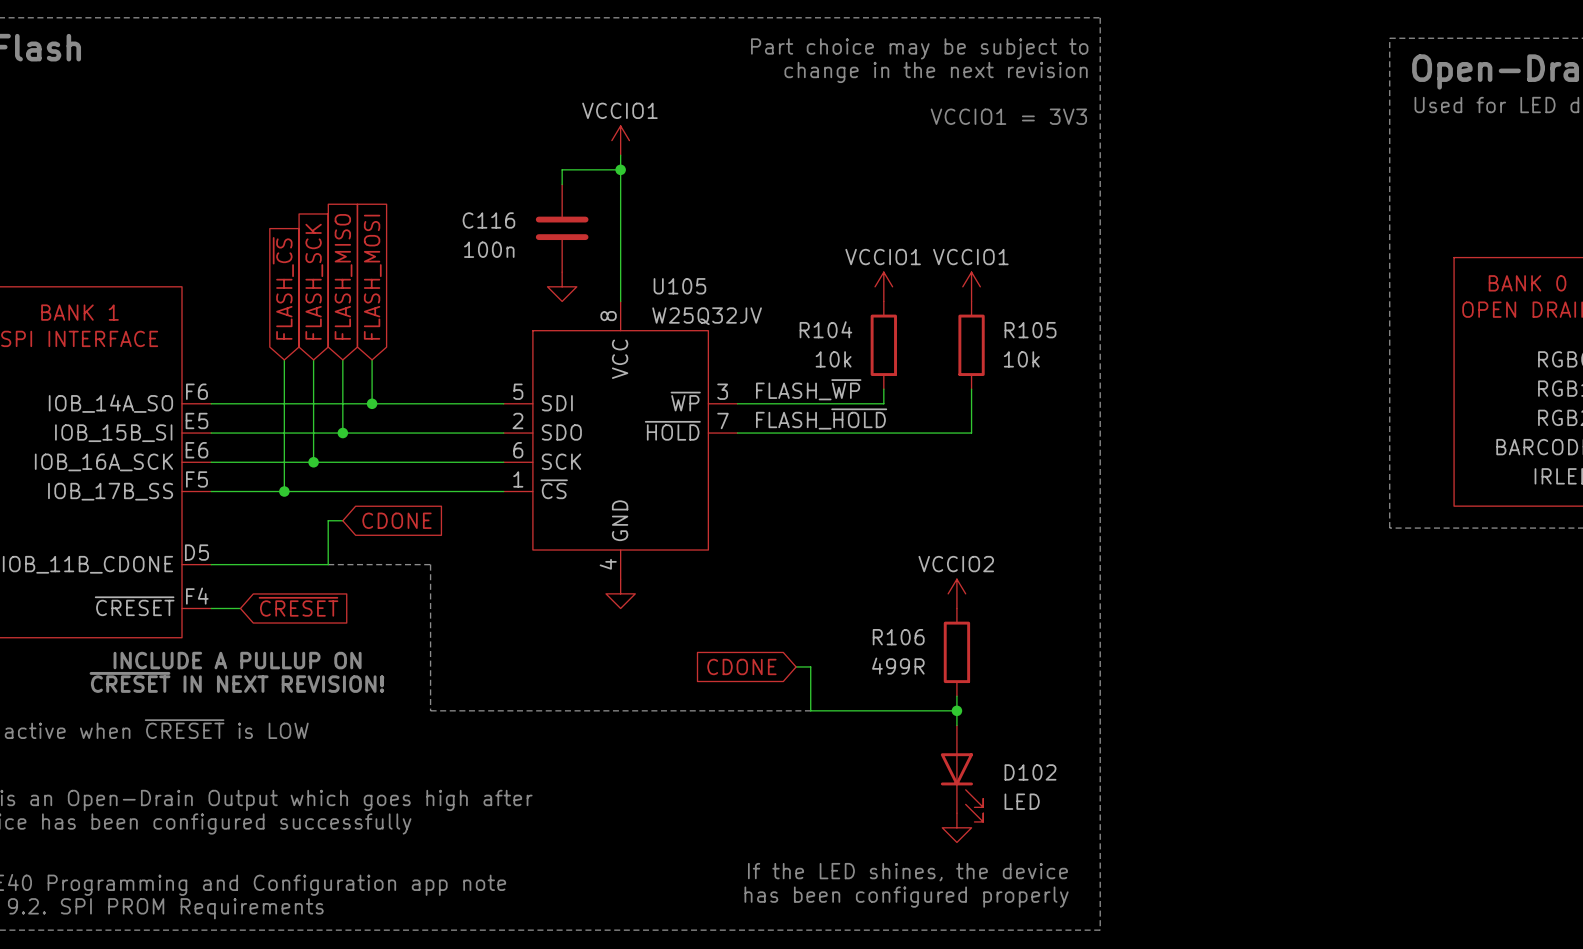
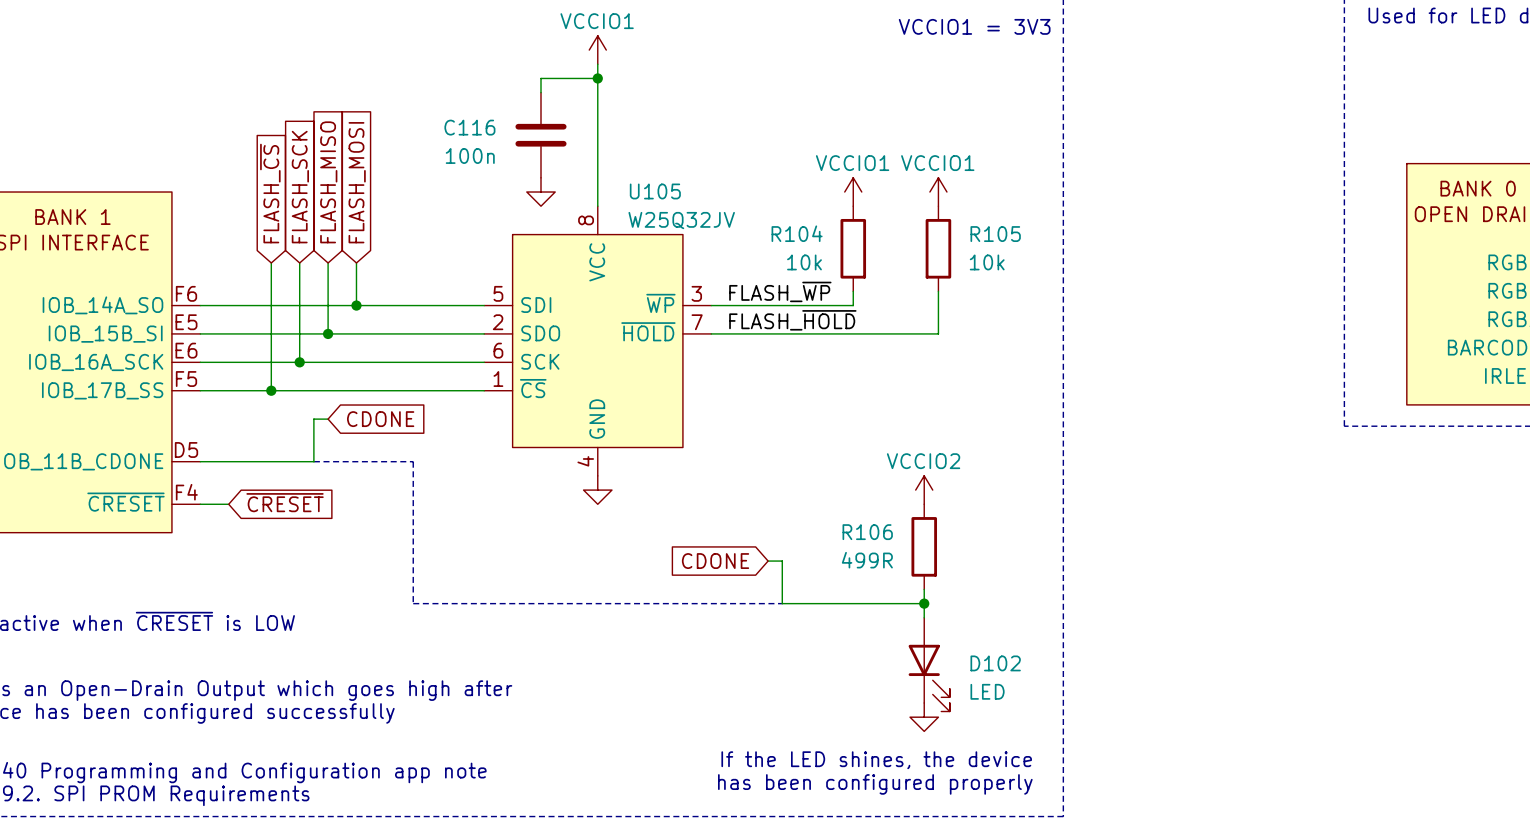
text: INCLUDE A PULLUP ON (237, 660) -> none
text: ~{CRESET} IN NEXT REVISION! (236, 682) -> none

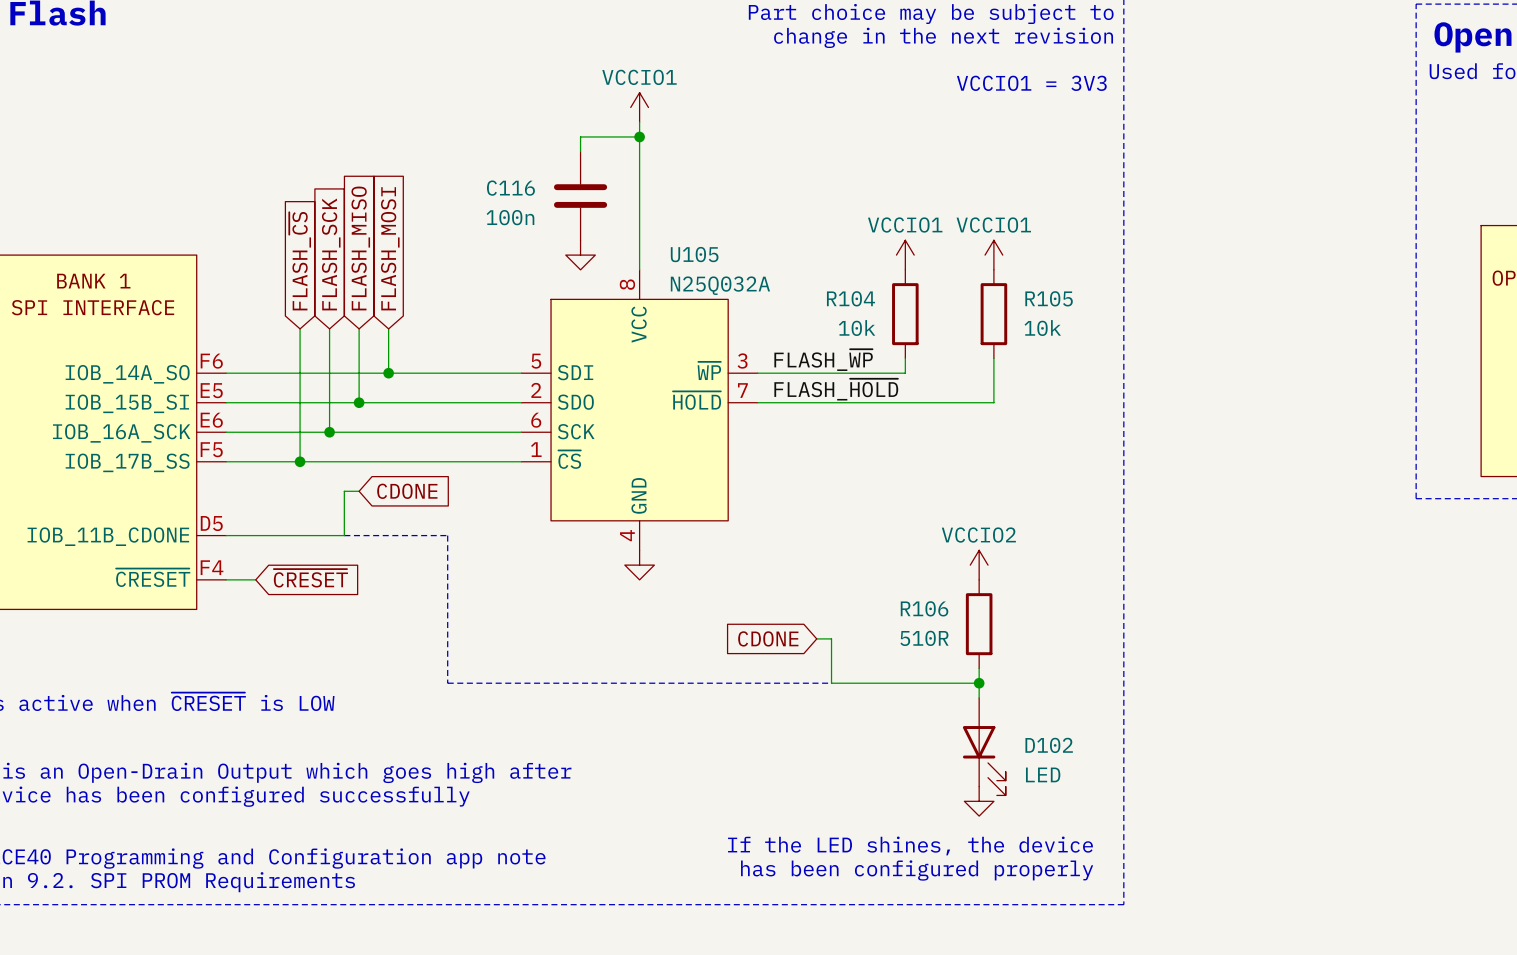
U105 value: W25Q32JV (681, 220) -> N25Q032A (720, 285)
R106 value: 499R (867, 560) -> 510R (924, 638)

